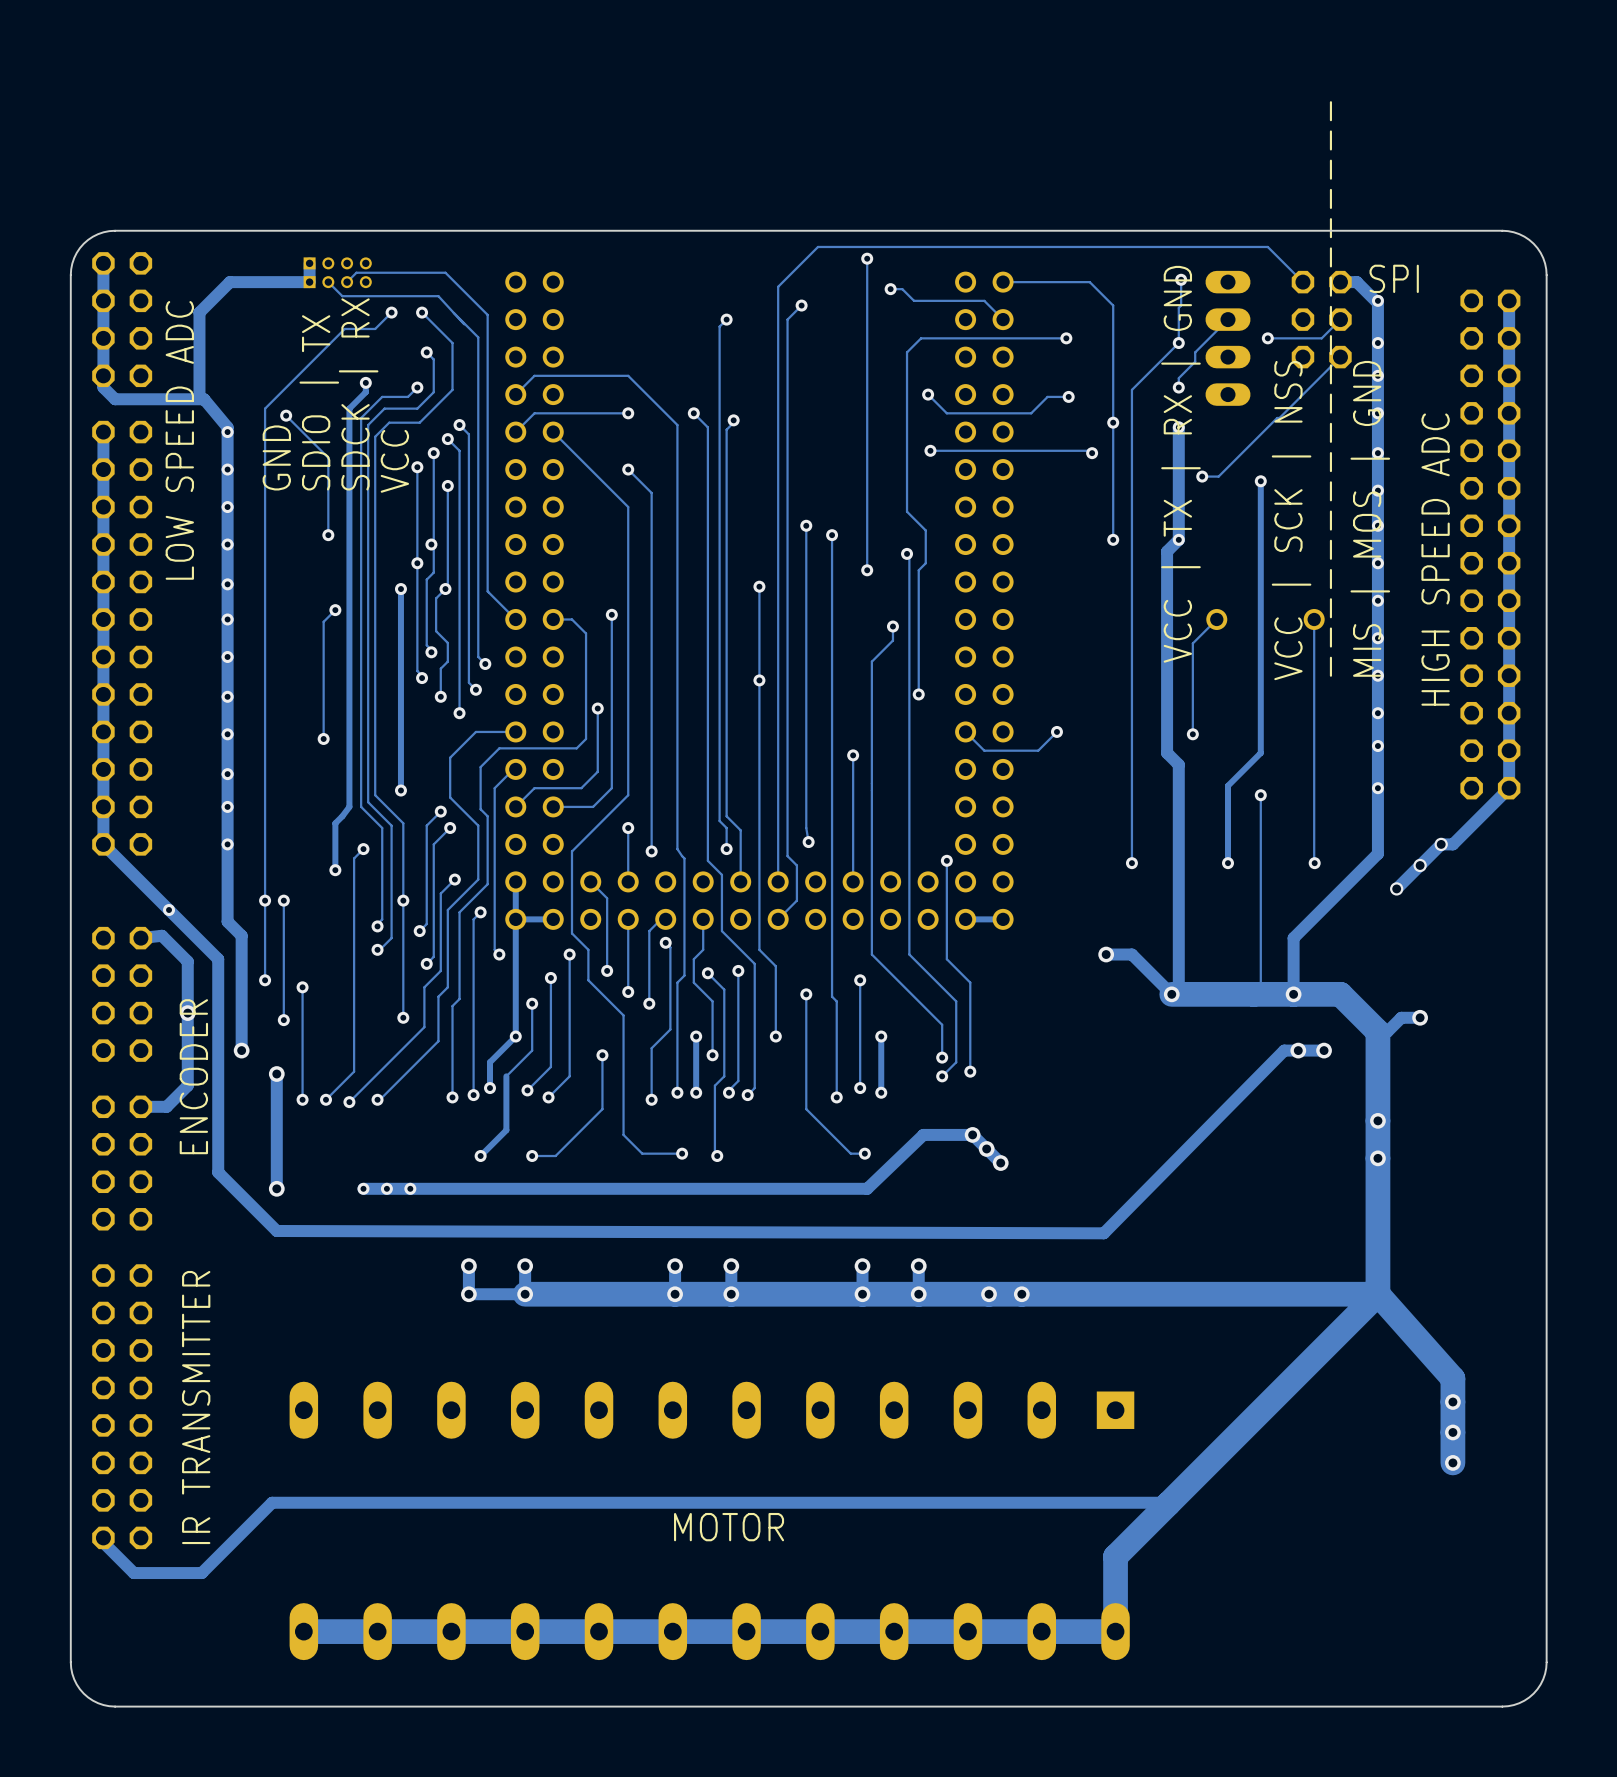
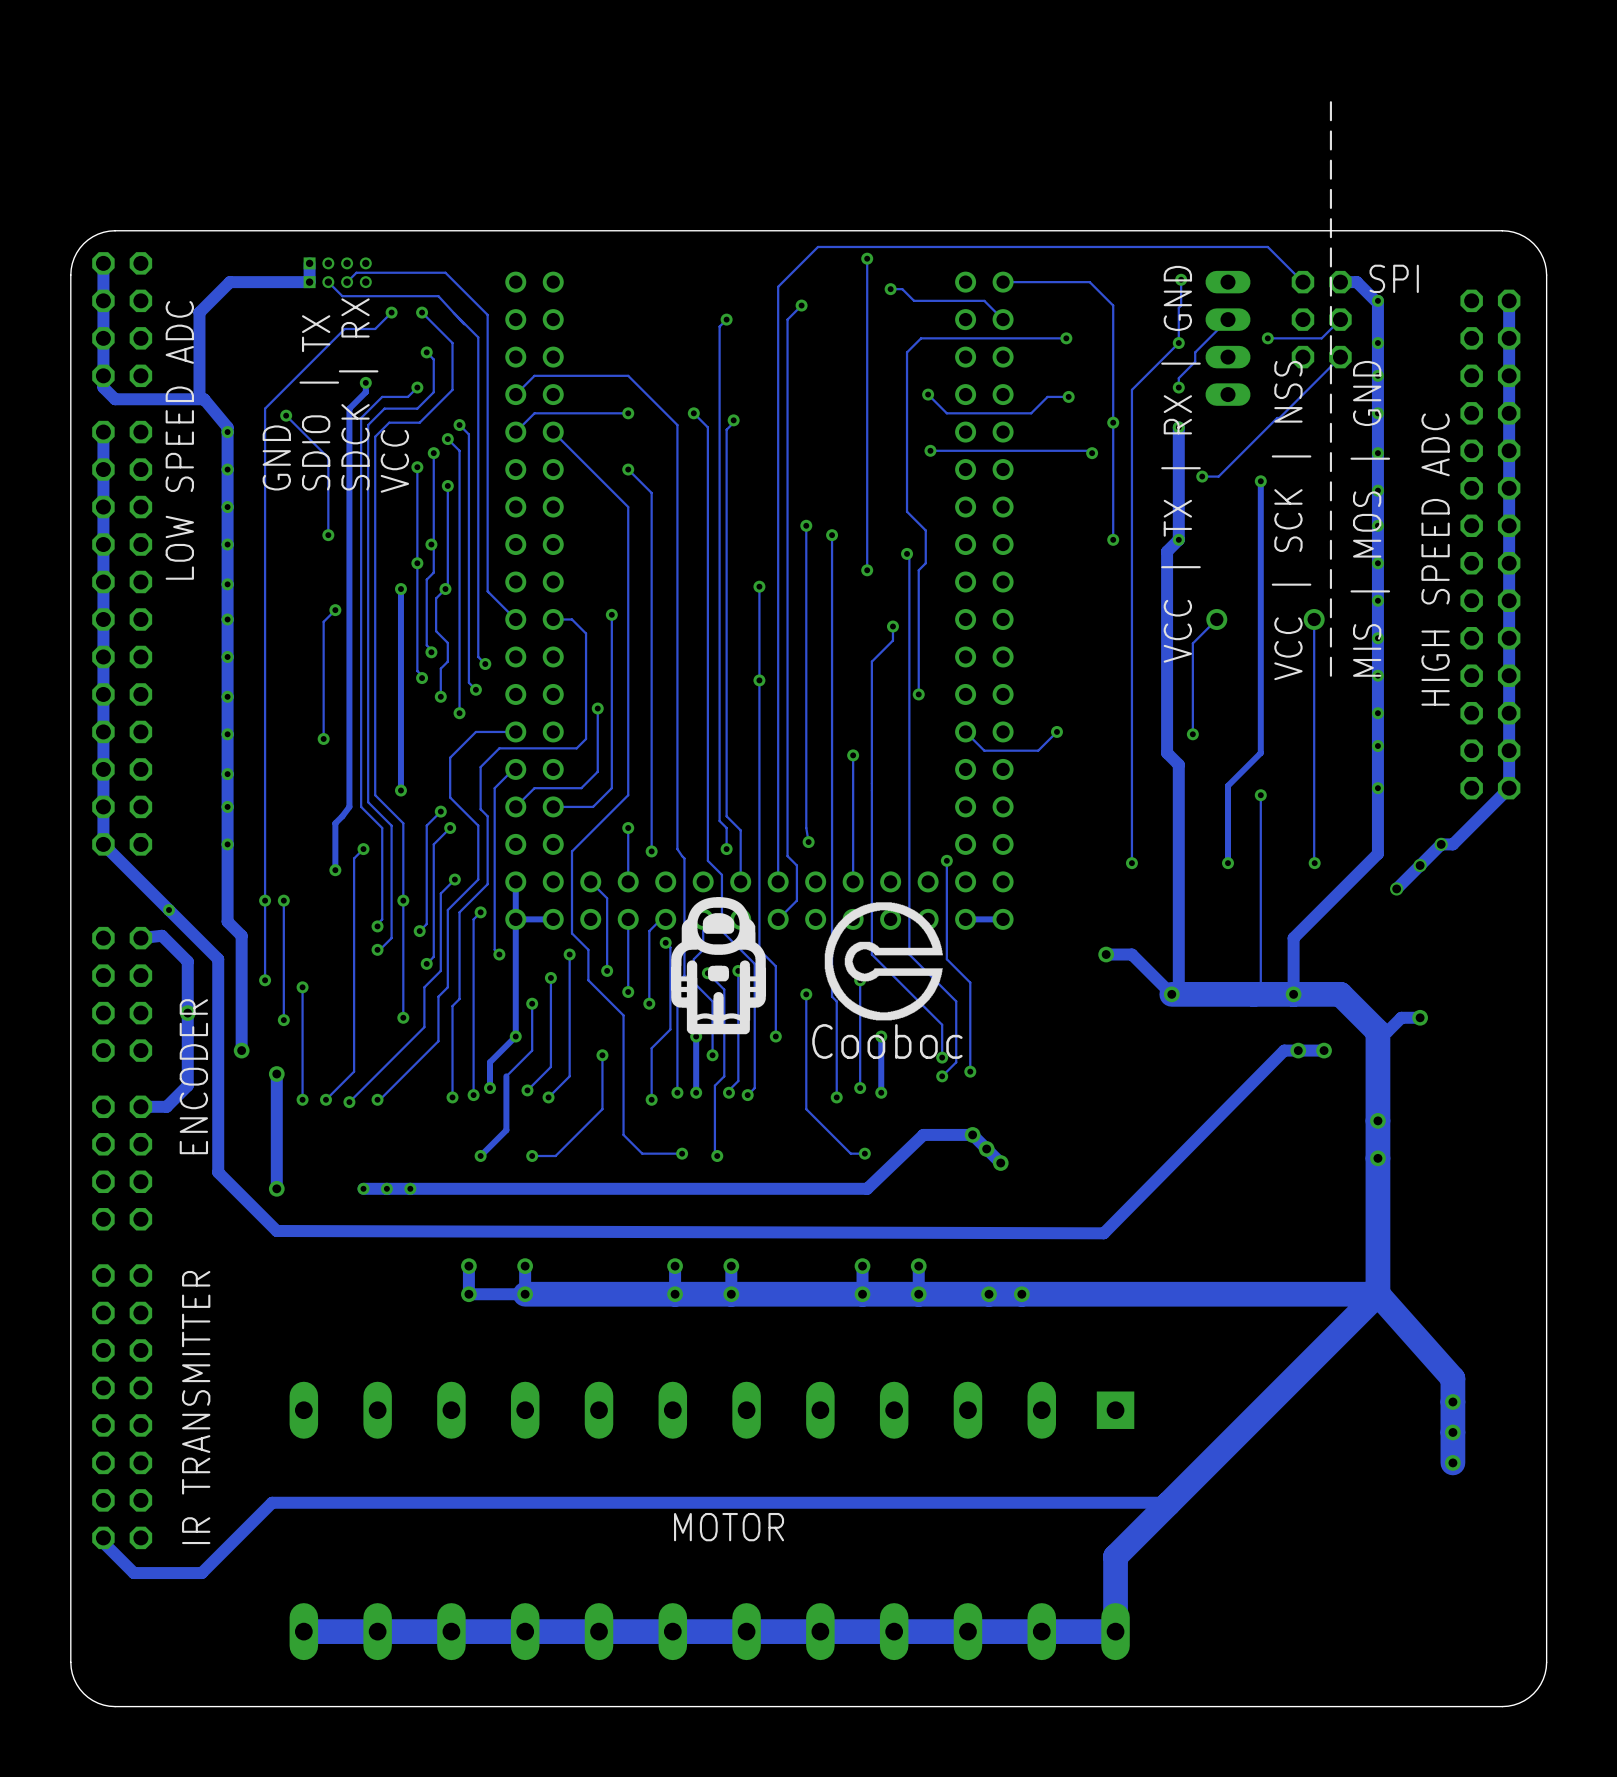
drawing: none -> [670, 897, 767, 1035]
drawing: none -> [824, 902, 943, 1021]

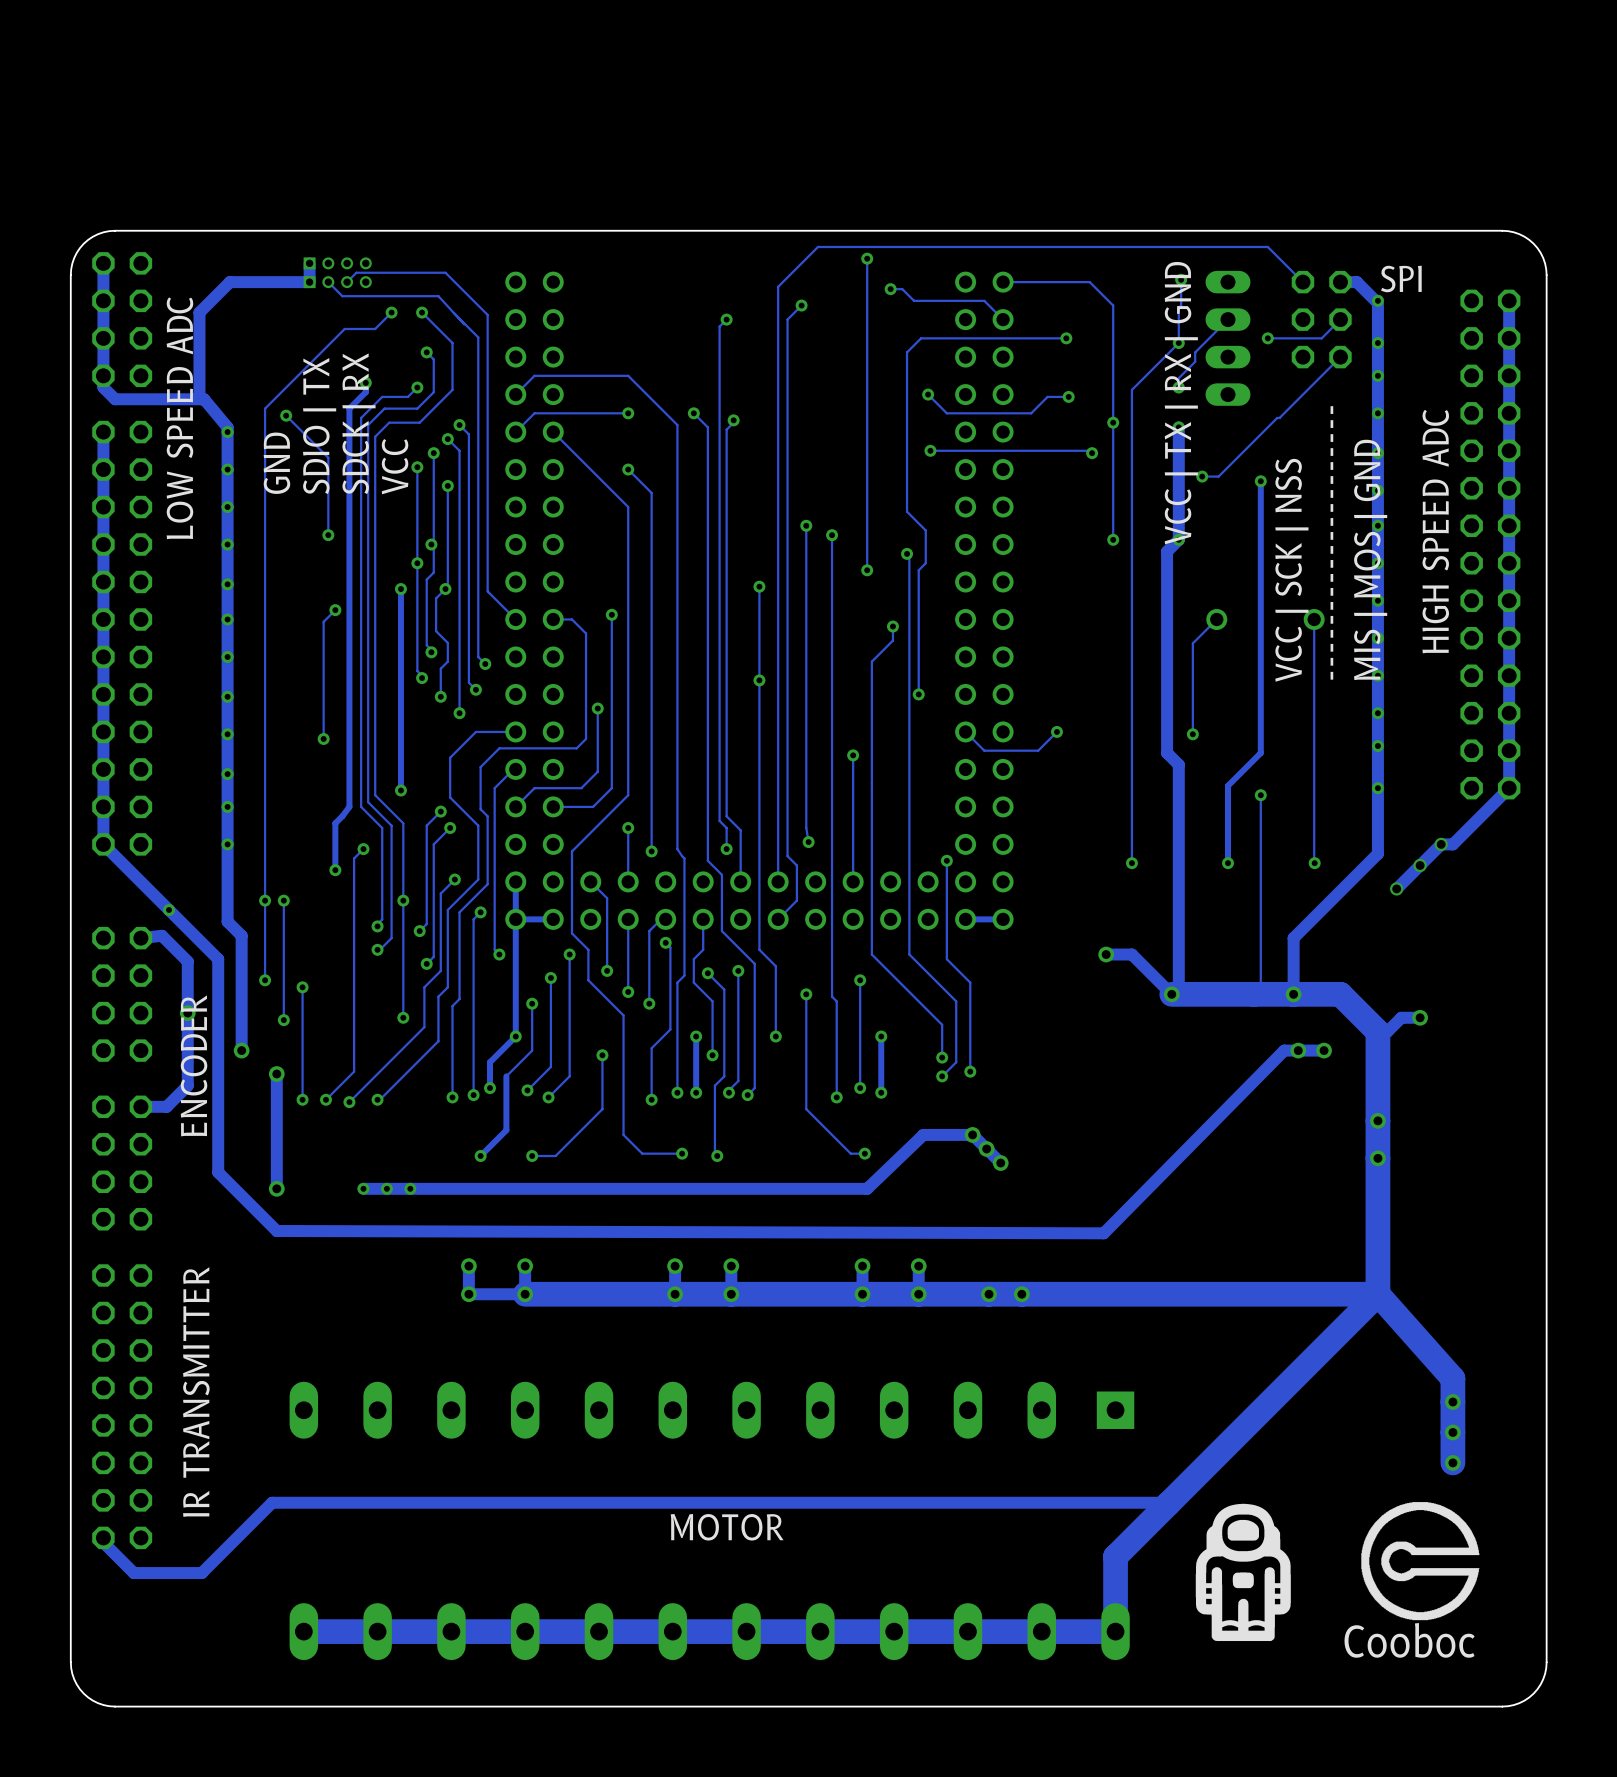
drawing: [670, 897, 767, 1035] -> none
drawing: [824, 902, 943, 1021] -> none
drawing: none -> [1361, 1502, 1480, 1621]
drawing: none -> [1195, 1503, 1291, 1642]

